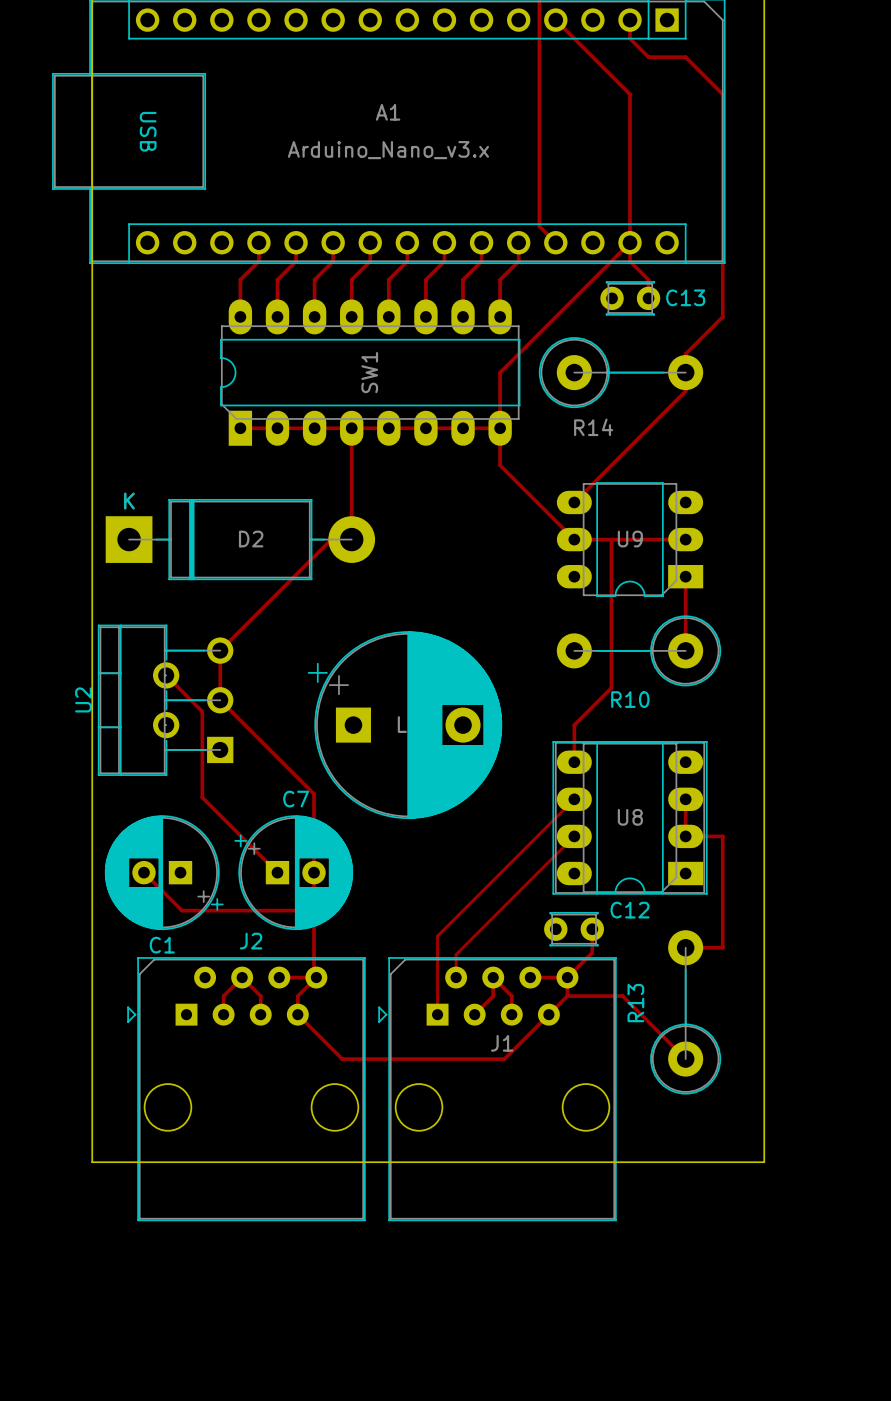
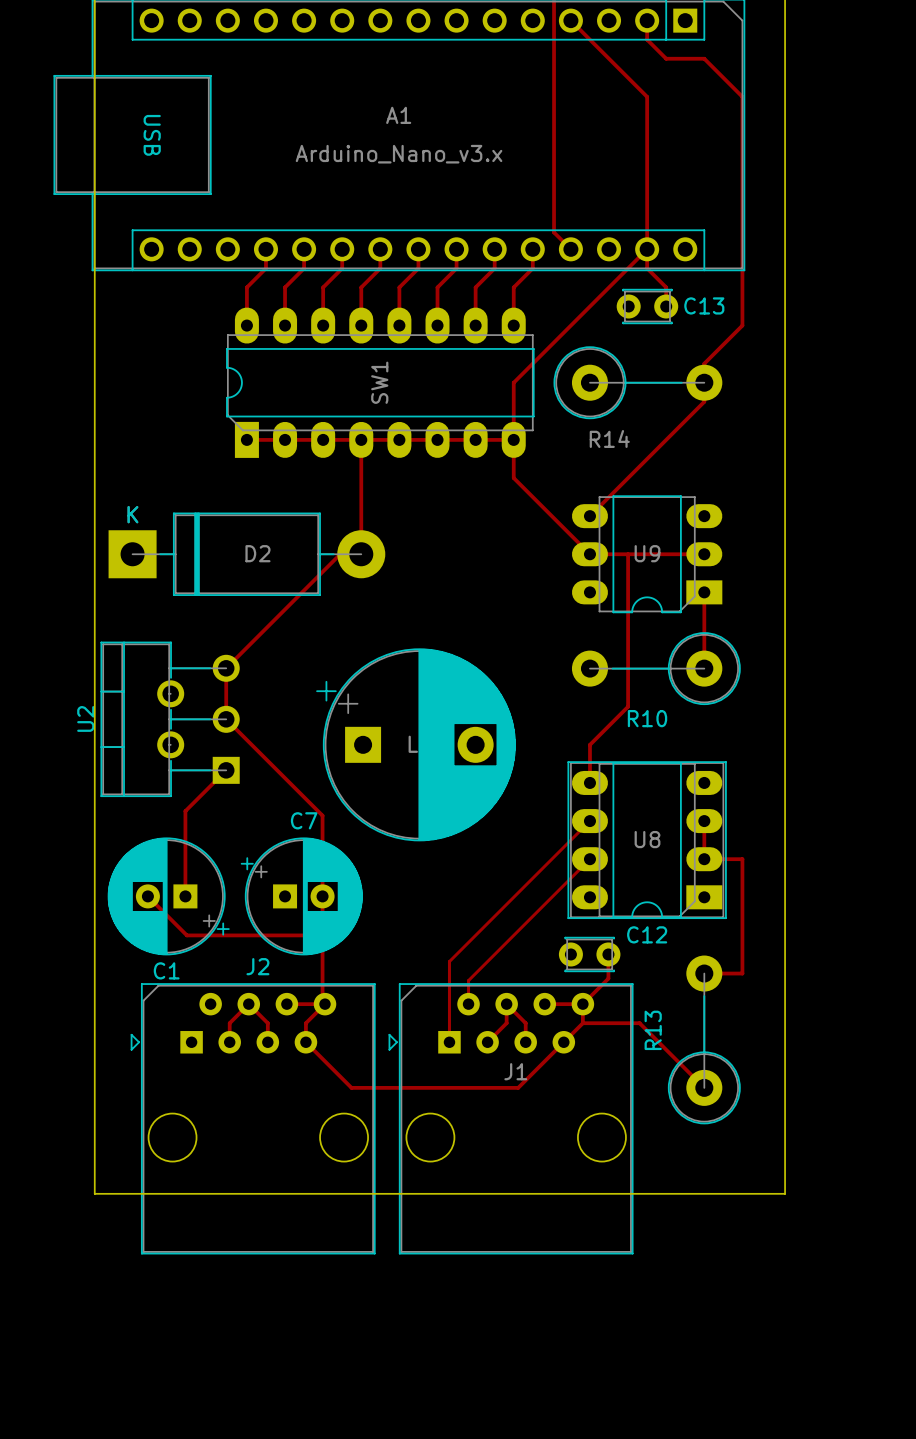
track: (166, 675) (202, 711) (202, 797) (277, 872) -> none
track: none -> (226, 770) (185, 811) (185, 896)

